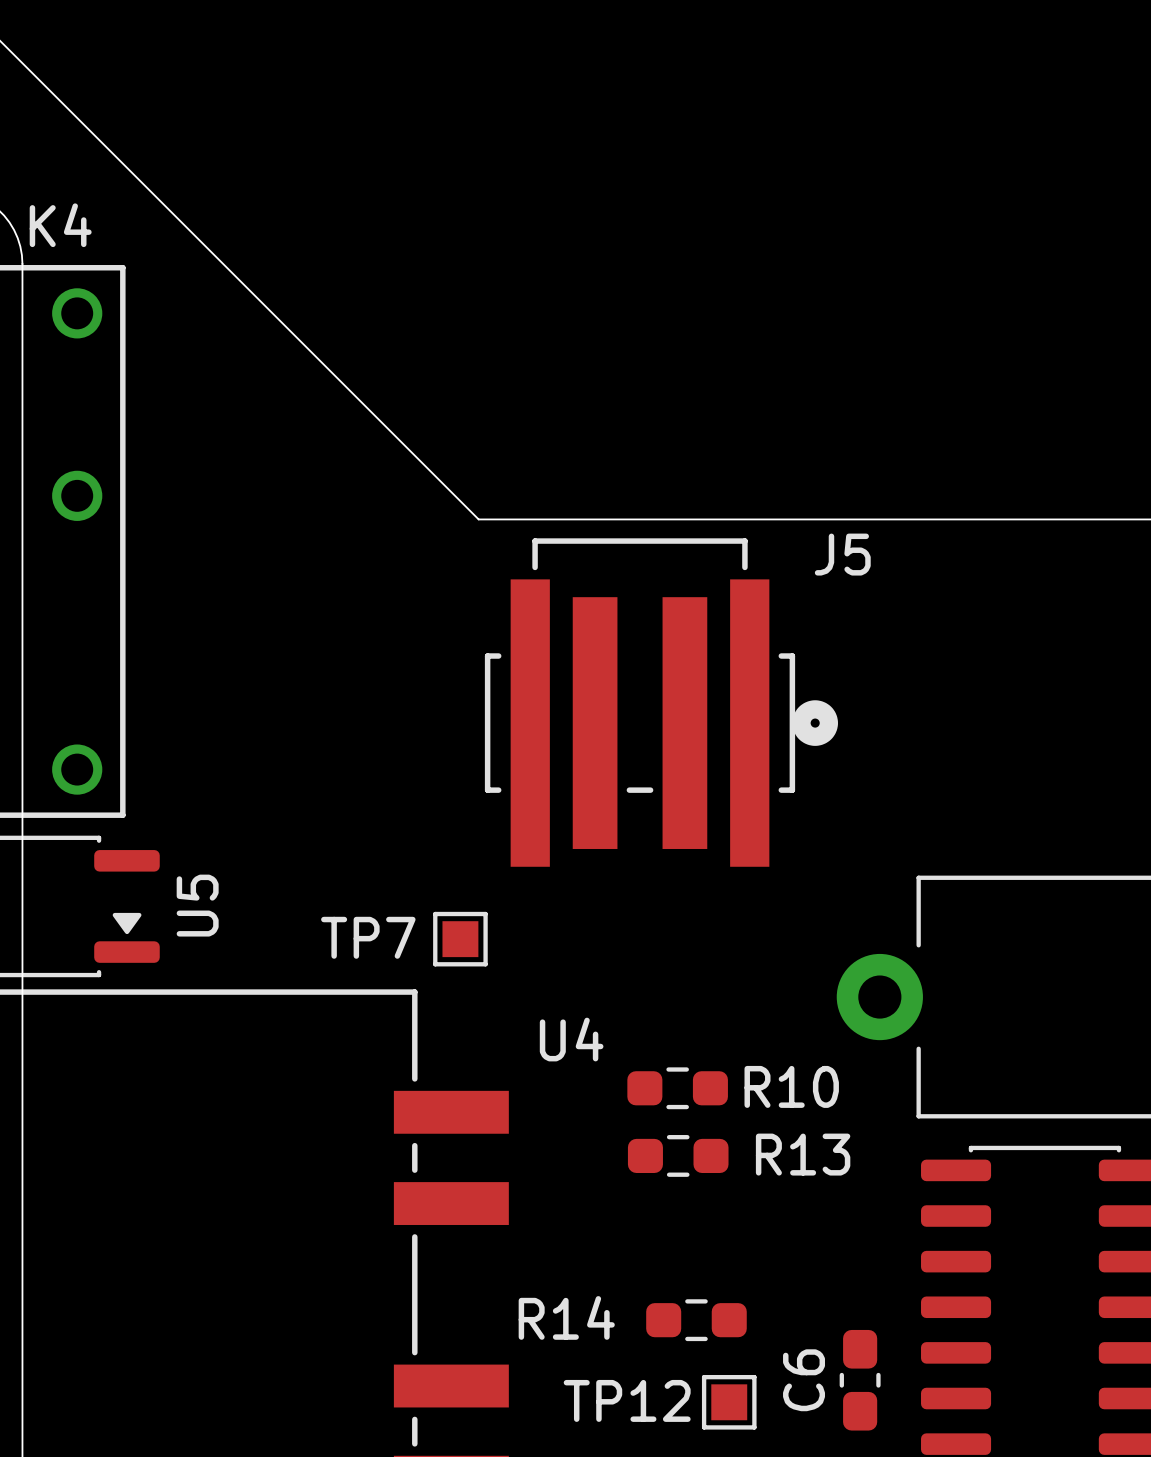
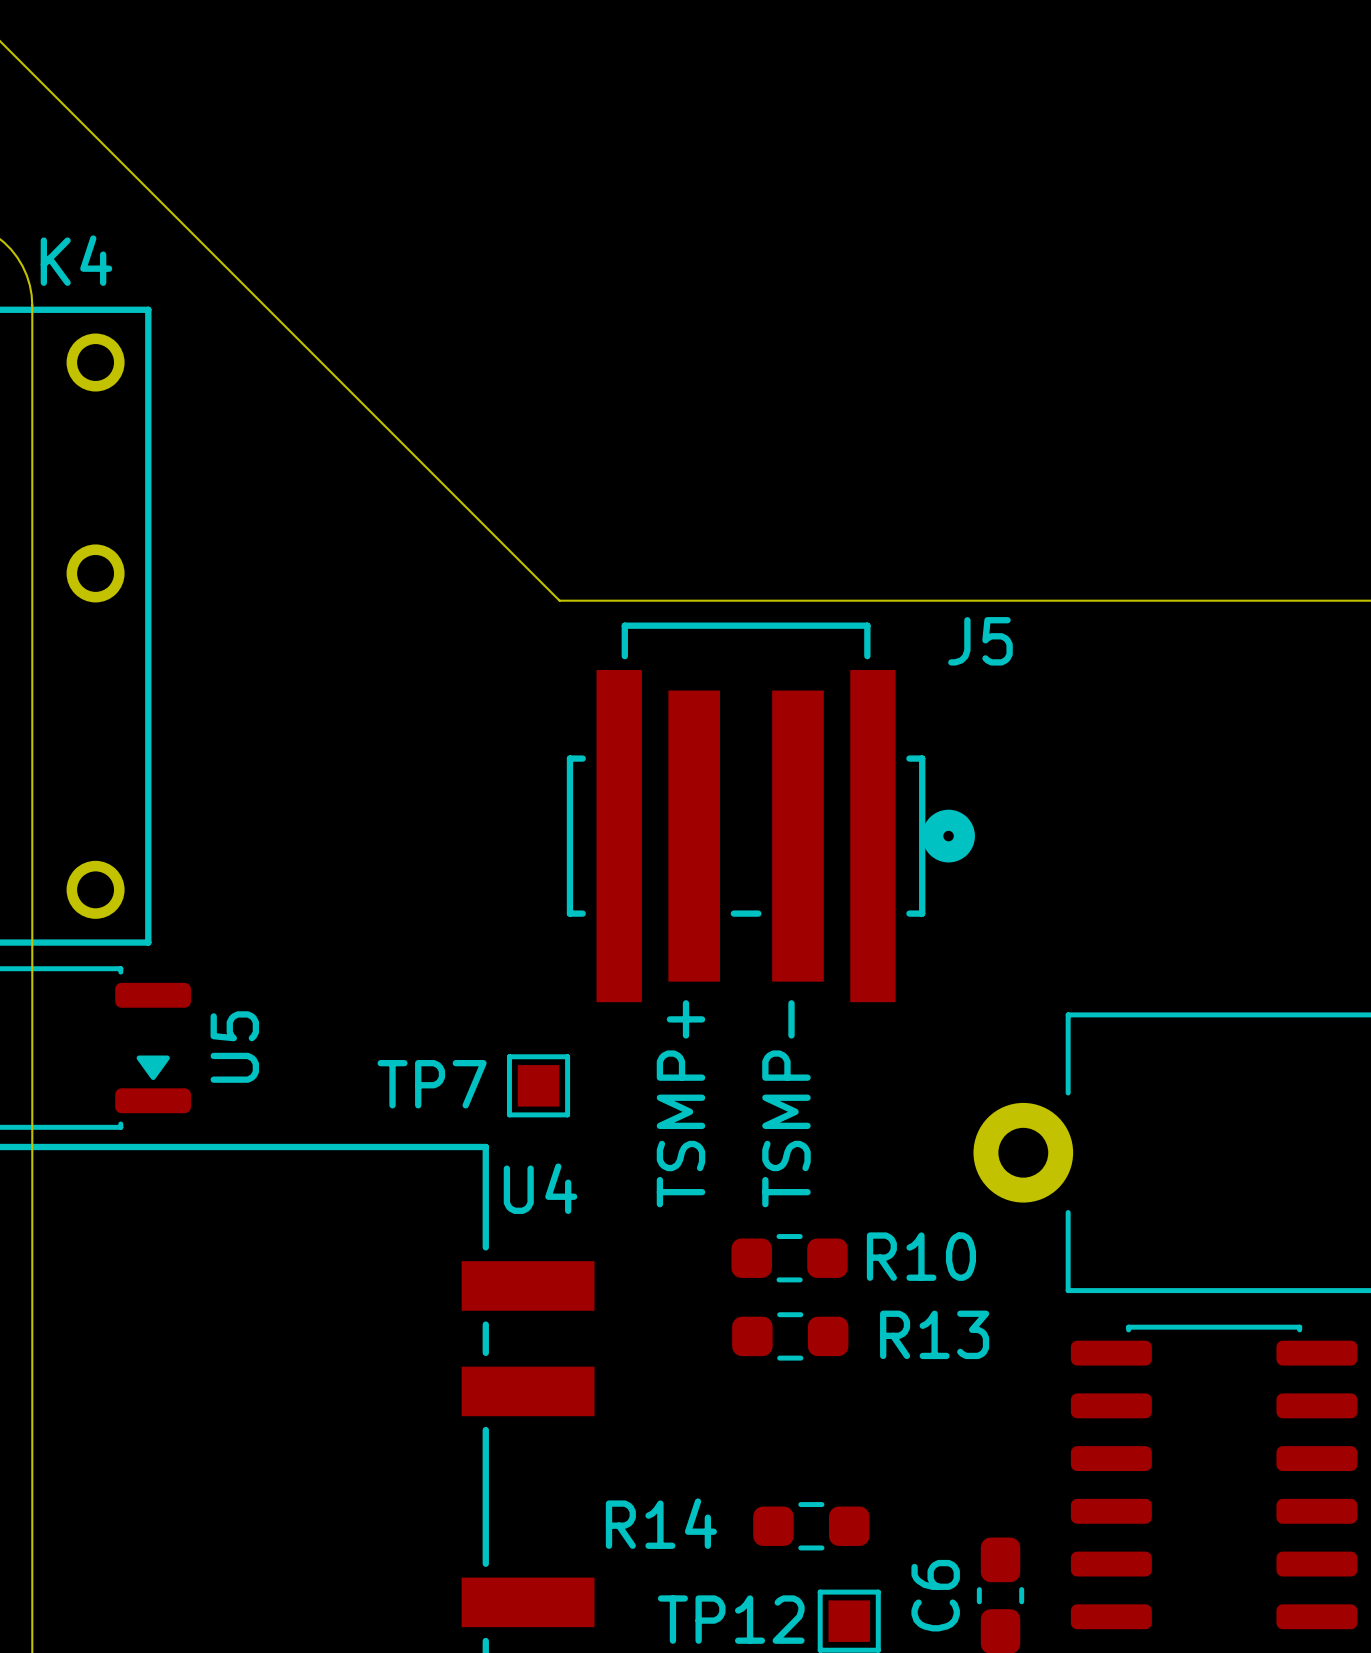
text: none -> TSMP+ (681, 1103)
text: none -> TSMP- (786, 1103)
U4 name position: U4 (571, 1039) -> U4 (540, 1188)

